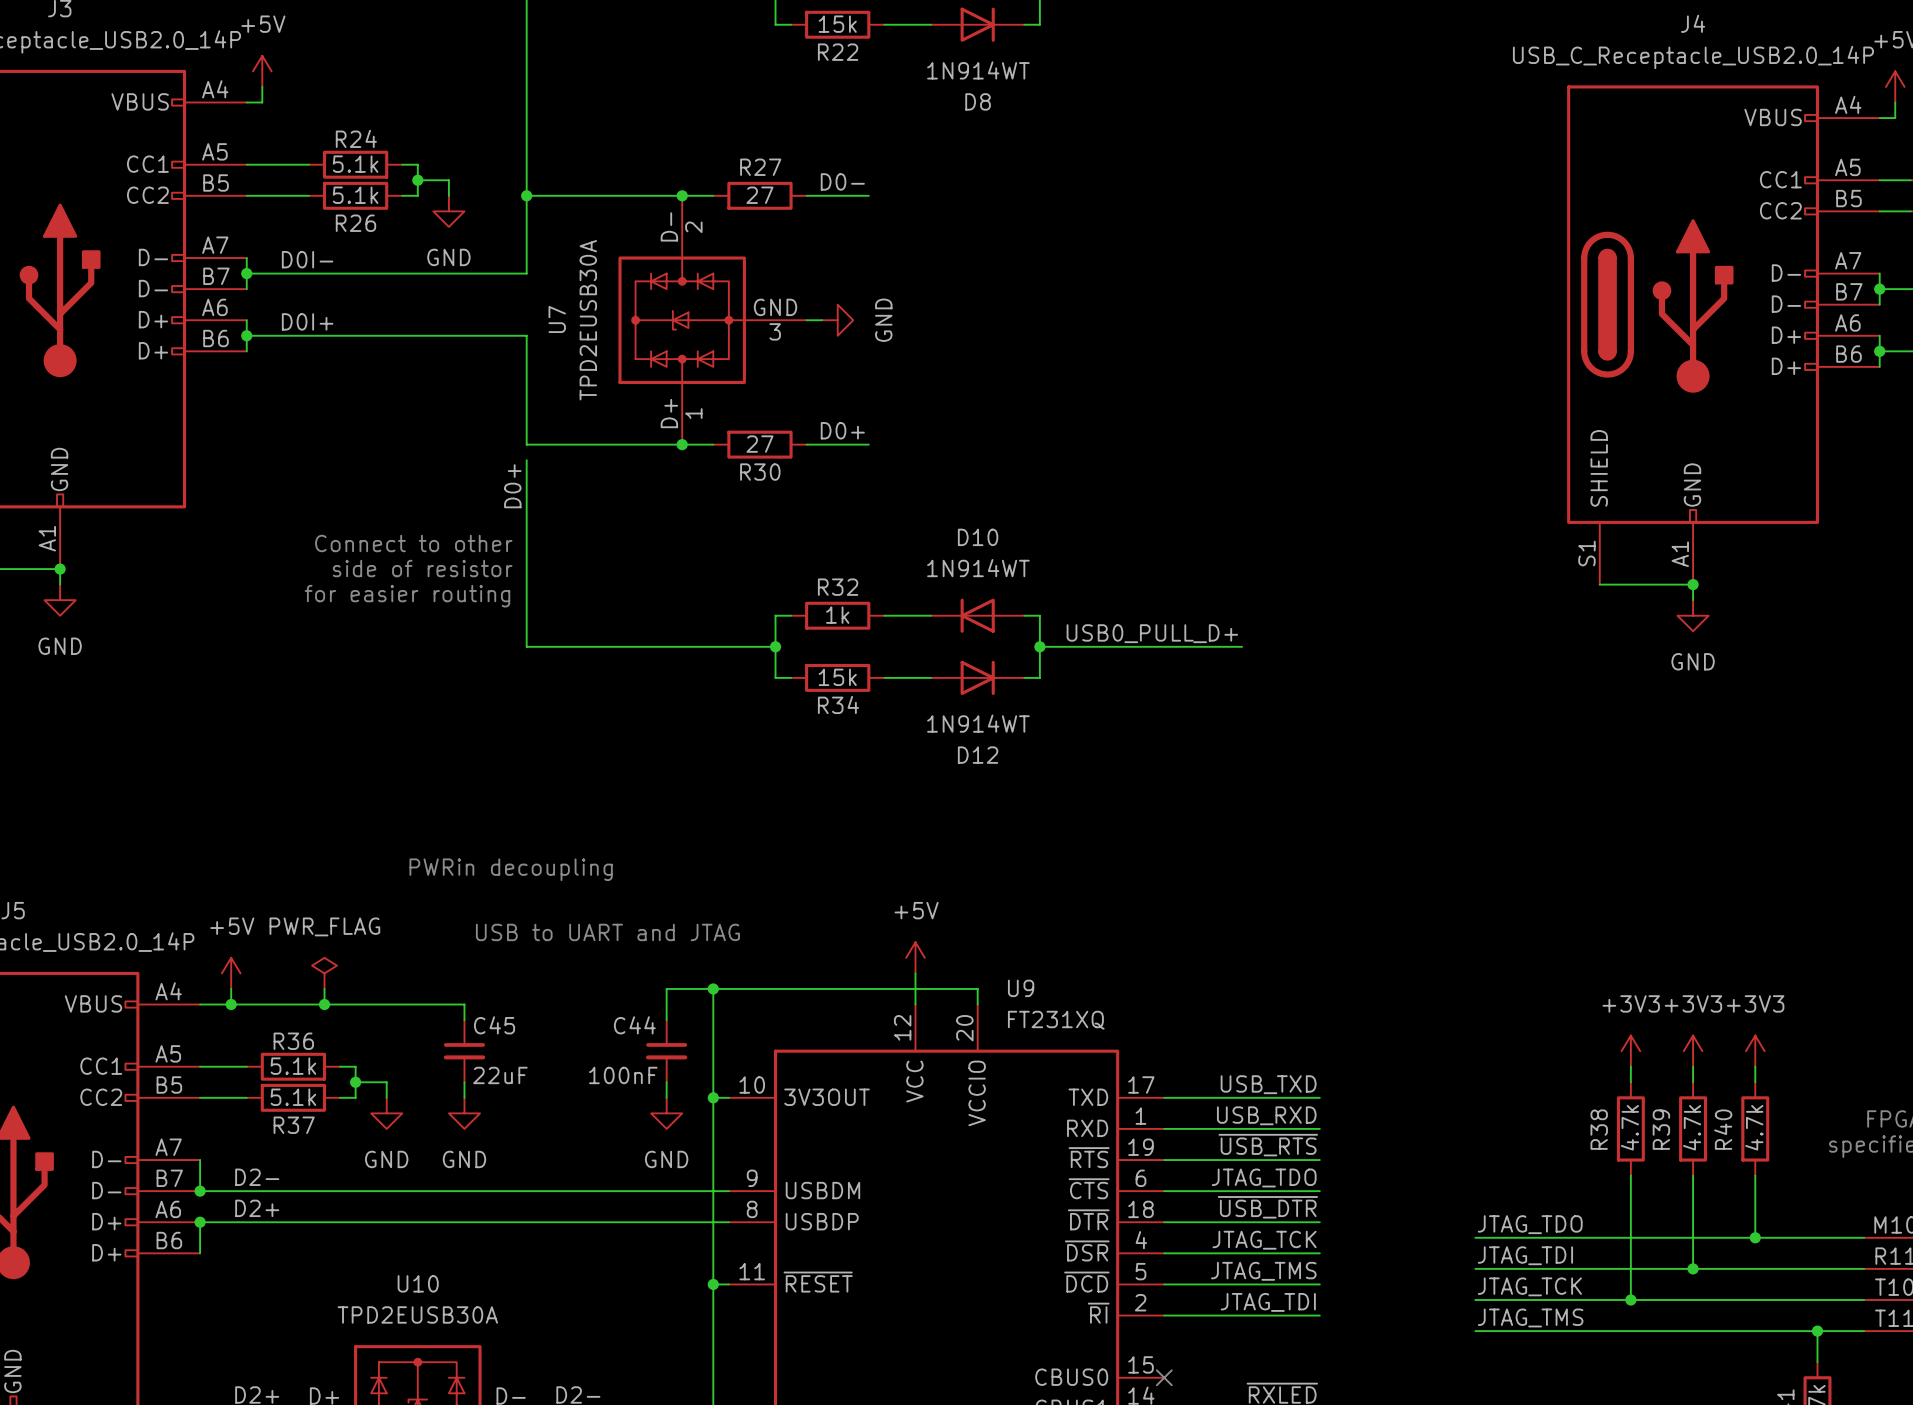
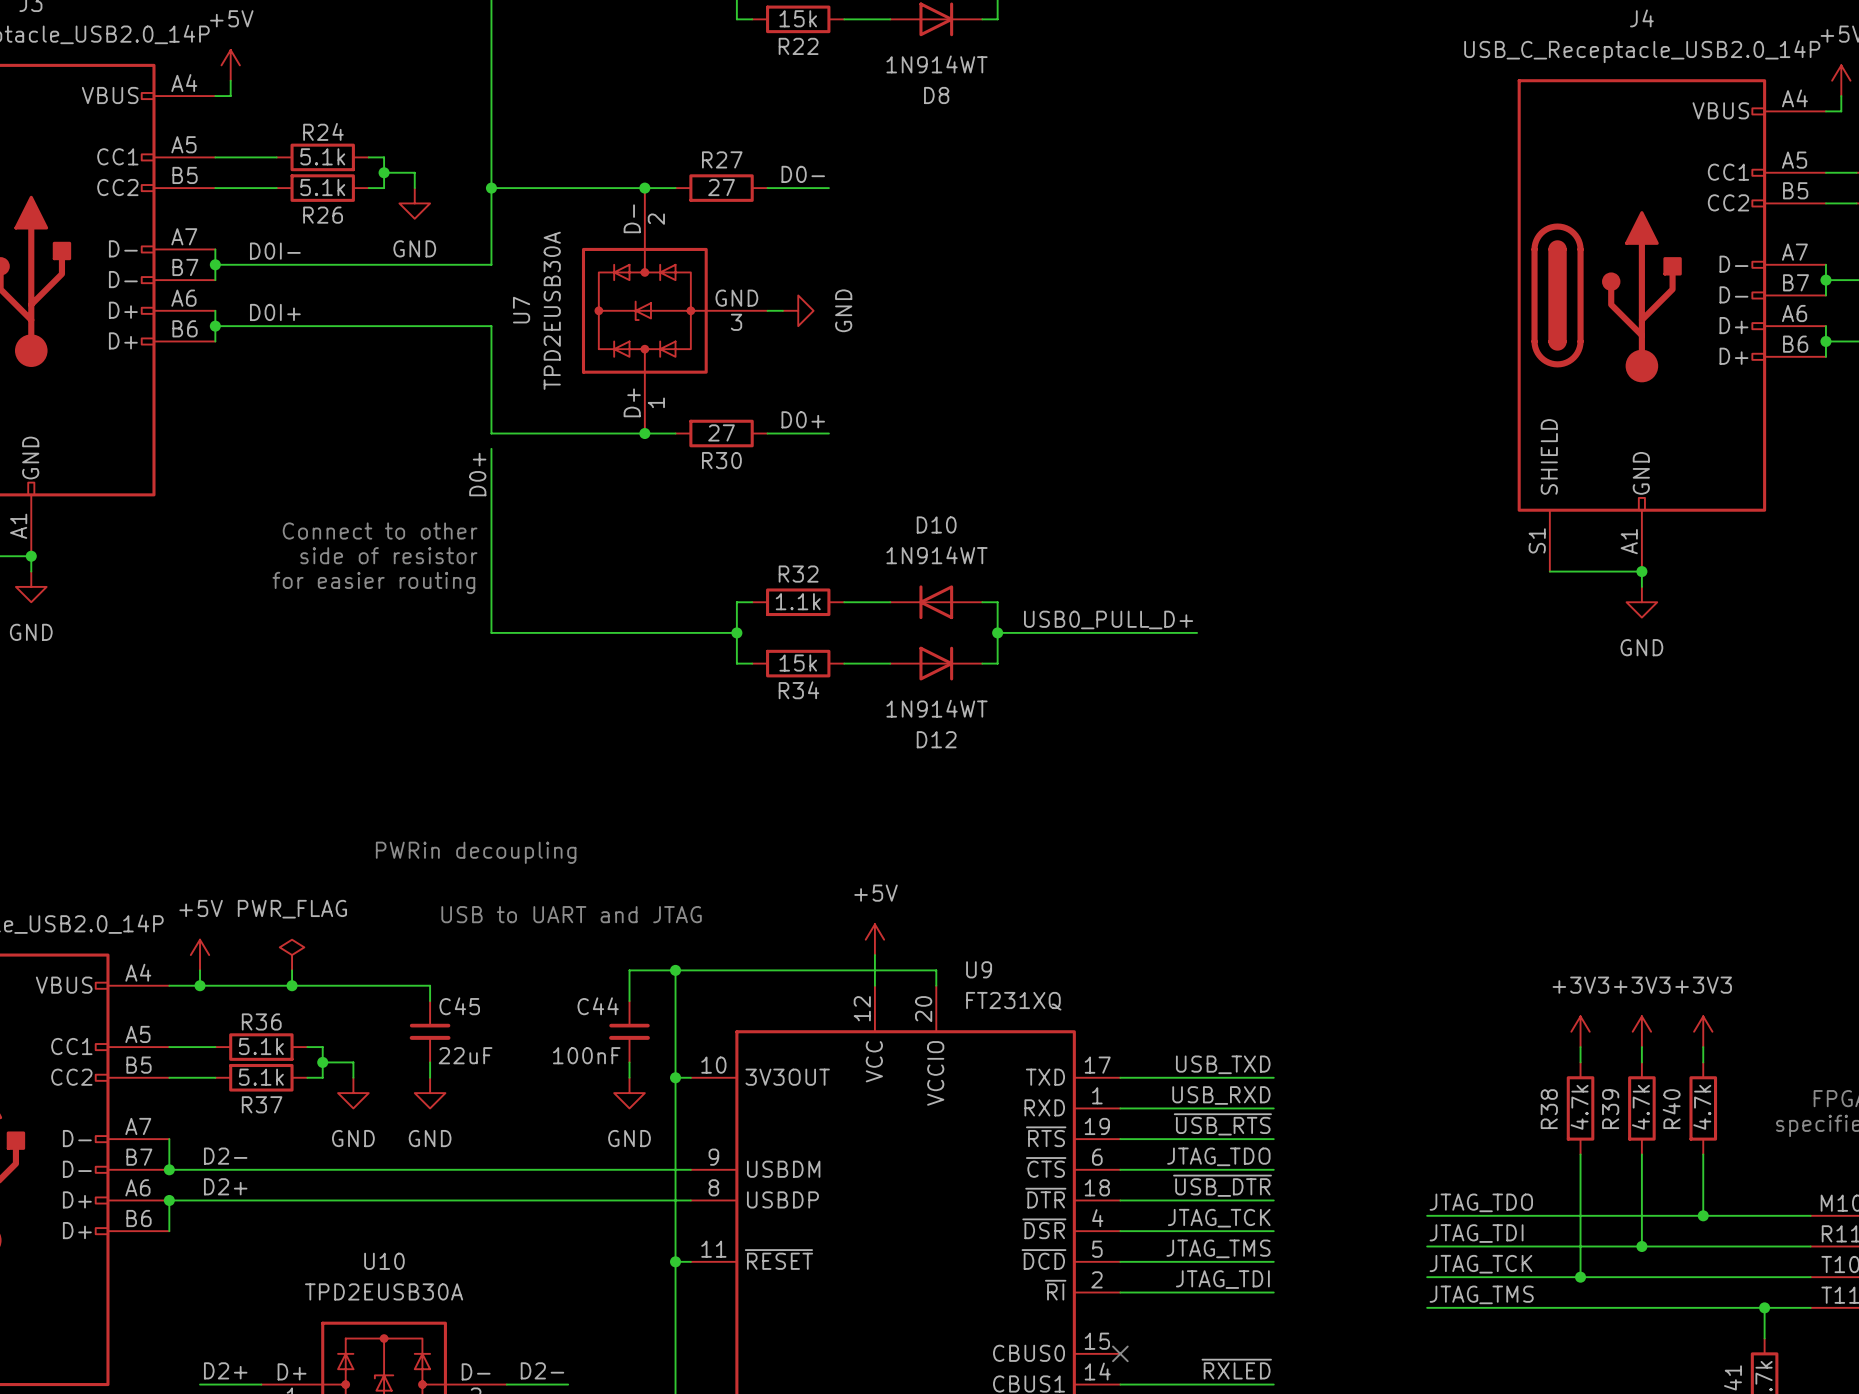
R32 value: 1k (837, 615) -> 1.1k (798, 601)

